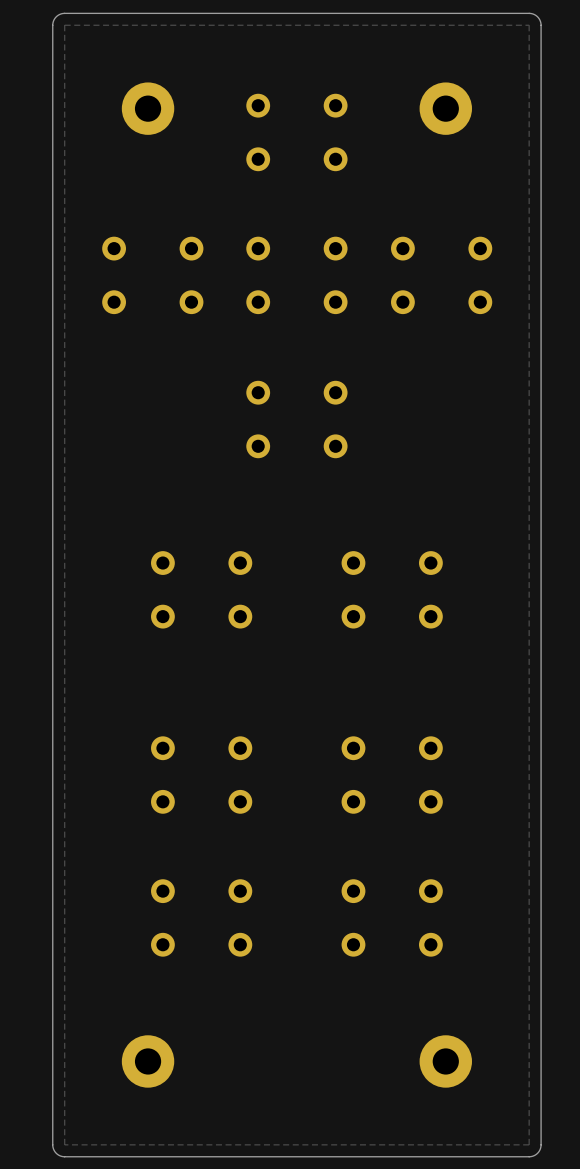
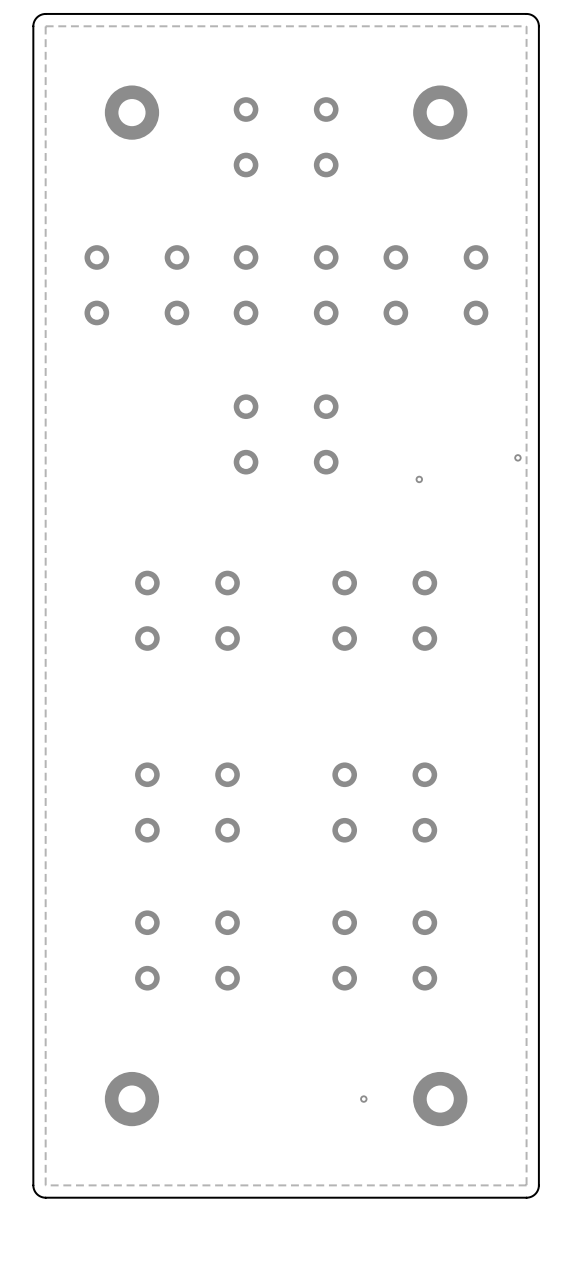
via: none -> (517, 457)
via: none -> (419, 479)
via: none -> (363, 1099)

